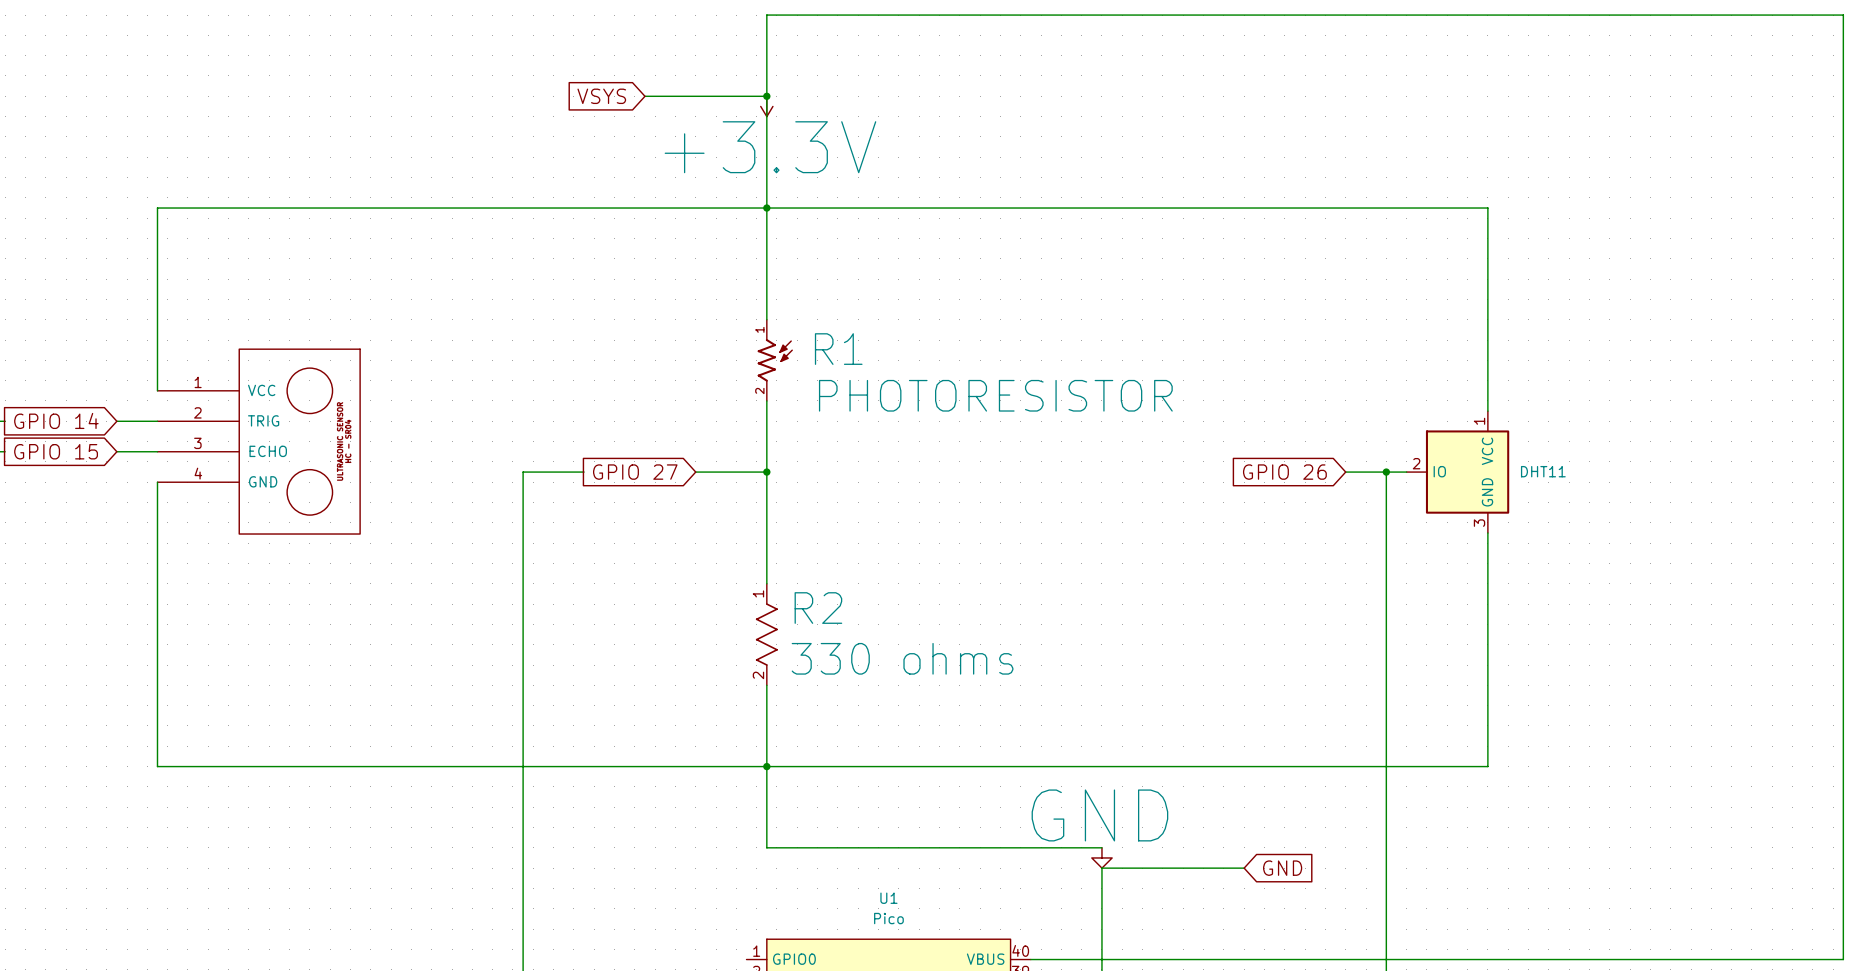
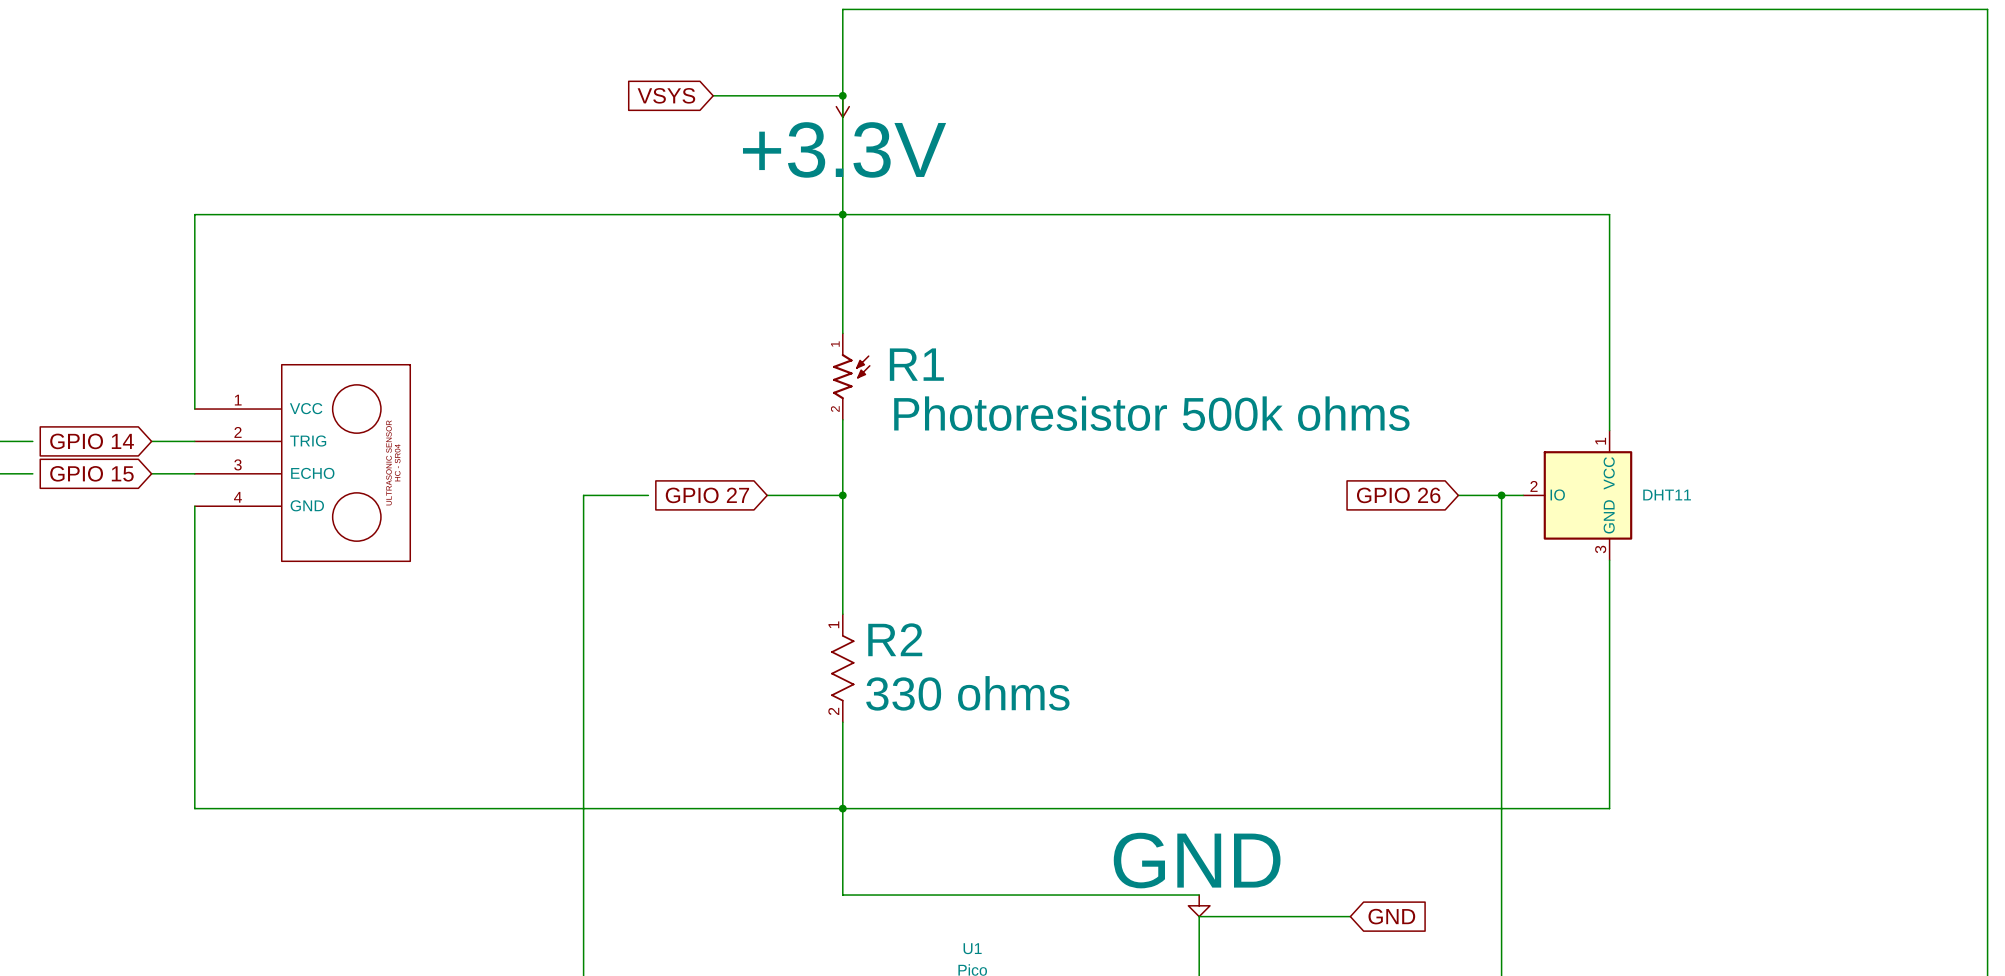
R1 value: PHOTORESISTOR (995, 395) -> Photoresistor 500k ohms (1151, 413)

